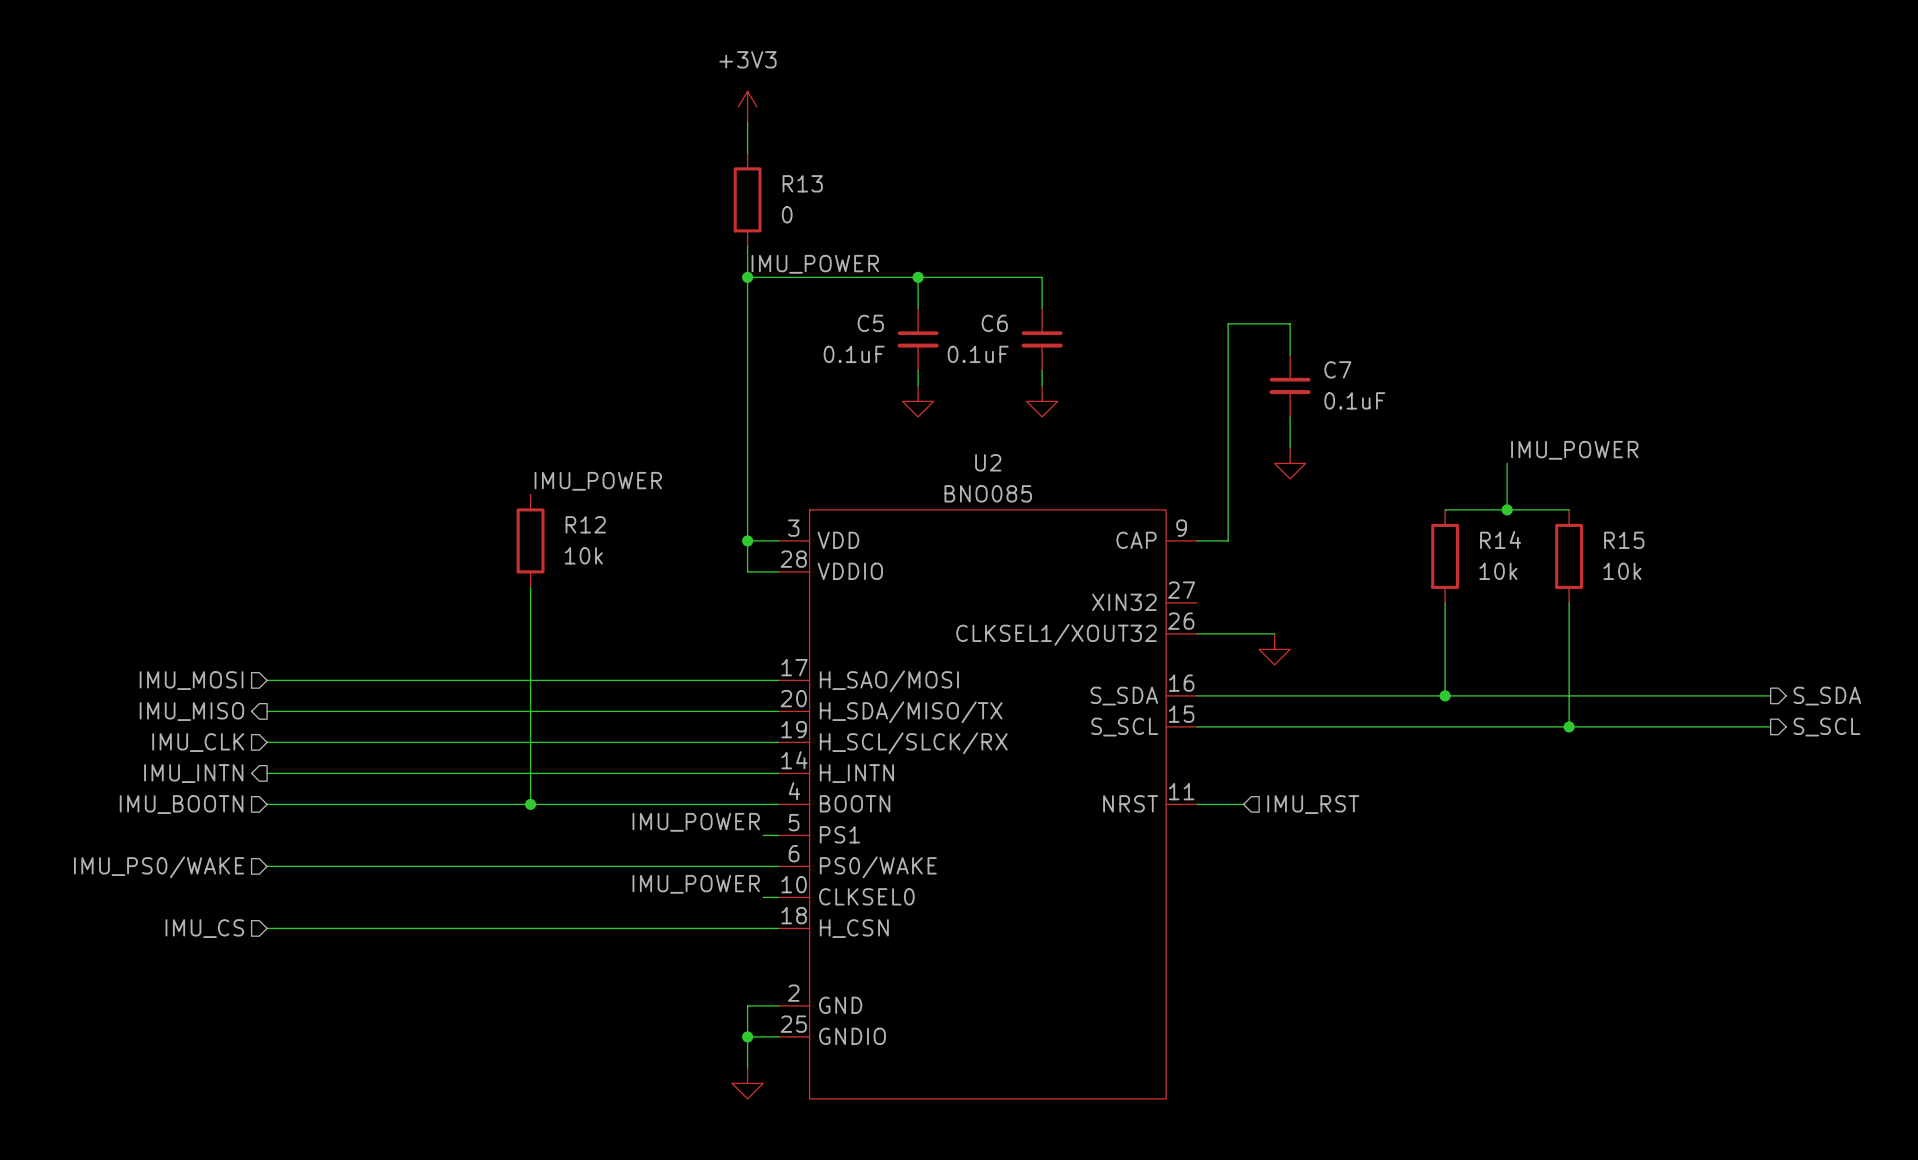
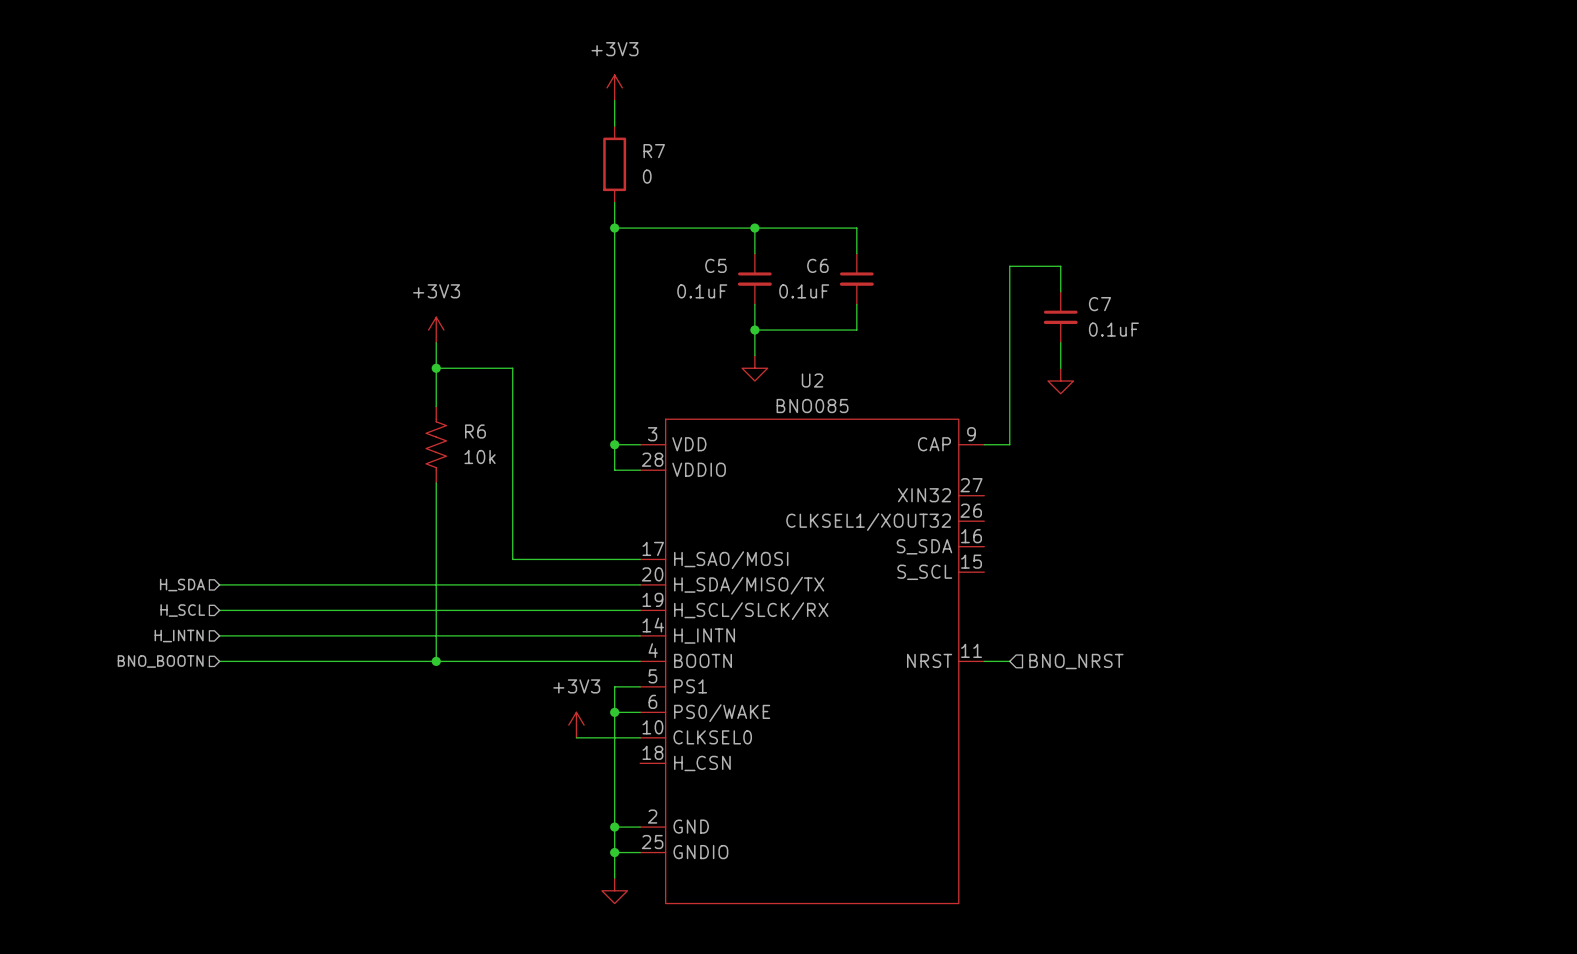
R13 name: R13 (802, 183) -> R7 (654, 151)
label: IMU_POWER (815, 264) -> none
wire: none -> (754, 317) (754, 355)
wire: none -> (856, 317) (856, 330) (754, 330)
power symbol: none -> +3V3 (436, 330)
junction: none -> (754, 330)
power symbol position: (918, 401) -> (754, 368)
power symbol: (1042, 401) -> none
wire: none -> (436, 342) (436, 406)
junction: none -> (436, 368)
label: IMU_POWER (1574, 450) -> none
wire: (1507, 463) (1507, 509) -> none
label: IMU_POWER (598, 481) -> none
U2 symbol: [778, 509, 1198, 1099] -> [640, 419, 985, 904]
wire: (1445, 509) (1569, 509) -> none
junction: (1507, 509) -> none
R12: 10k (530, 540) -> none
R6: none -> 10k (436, 444)
R14: 10k (1445, 556) -> none
R15: 10k (1569, 556) -> none
wire: (1445, 602) (1445, 695) -> none
wire: (1569, 602) (1569, 726) -> none
wire: (1197, 633) (1274, 633) -> none
power symbol: (1274, 649) -> none
hierarchical label: IMU_MOSI (191, 680) -> none
wire: (267, 680) (623, 680) -> (436, 368) (512, 368) (512, 559)
wire: (1197, 695) (1770, 695) -> none
junction: (1445, 695) -> none
hierarchical label: S_SDA (1827, 696) -> none
hierarchical label shape: output (191, 711) -> input (182, 585)
hierarchical label: IMU_MISO (191, 711) -> H_SDA (182, 585)
wire: (1197, 726) (1770, 726) -> none
junction: (1569, 726) -> none
hierarchical label: S_SCL (1826, 727) -> none
hierarchical label: IMU_CLK (198, 742) -> H_SCL (182, 610)
hierarchical label shape: output (193, 773) -> input (179, 636)
hierarchical label: IMU_INTN (193, 773) -> H_INTN (179, 636)
hierarchical label: IMU_BOOTN (181, 804) -> BNO_BOOTN (160, 661)
wire: (1228, 804) (1243, 804) -> none
hierarchical label: none -> BNO_NRST (1076, 661)
hierarchical label: IMU_RST (1313, 804) -> none
label: IMU_POWER (696, 822) -> none
wire: none -> (627, 686) (614, 686) (614, 827)
wire: (267, 866) (747, 866) -> none
junction: none -> (614, 712)
hierarchical label: IMU_PS0/WAKE (159, 867) -> none
power symbol: none -> +3V3 (576, 725)
label: IMU_POWER (696, 884) -> none
wire: none -> (576, 737) (627, 737)
hierarchical label: IMU_CS (204, 928) -> none
wire: (267, 928) (778, 928) -> none
junction: none -> (614, 827)

